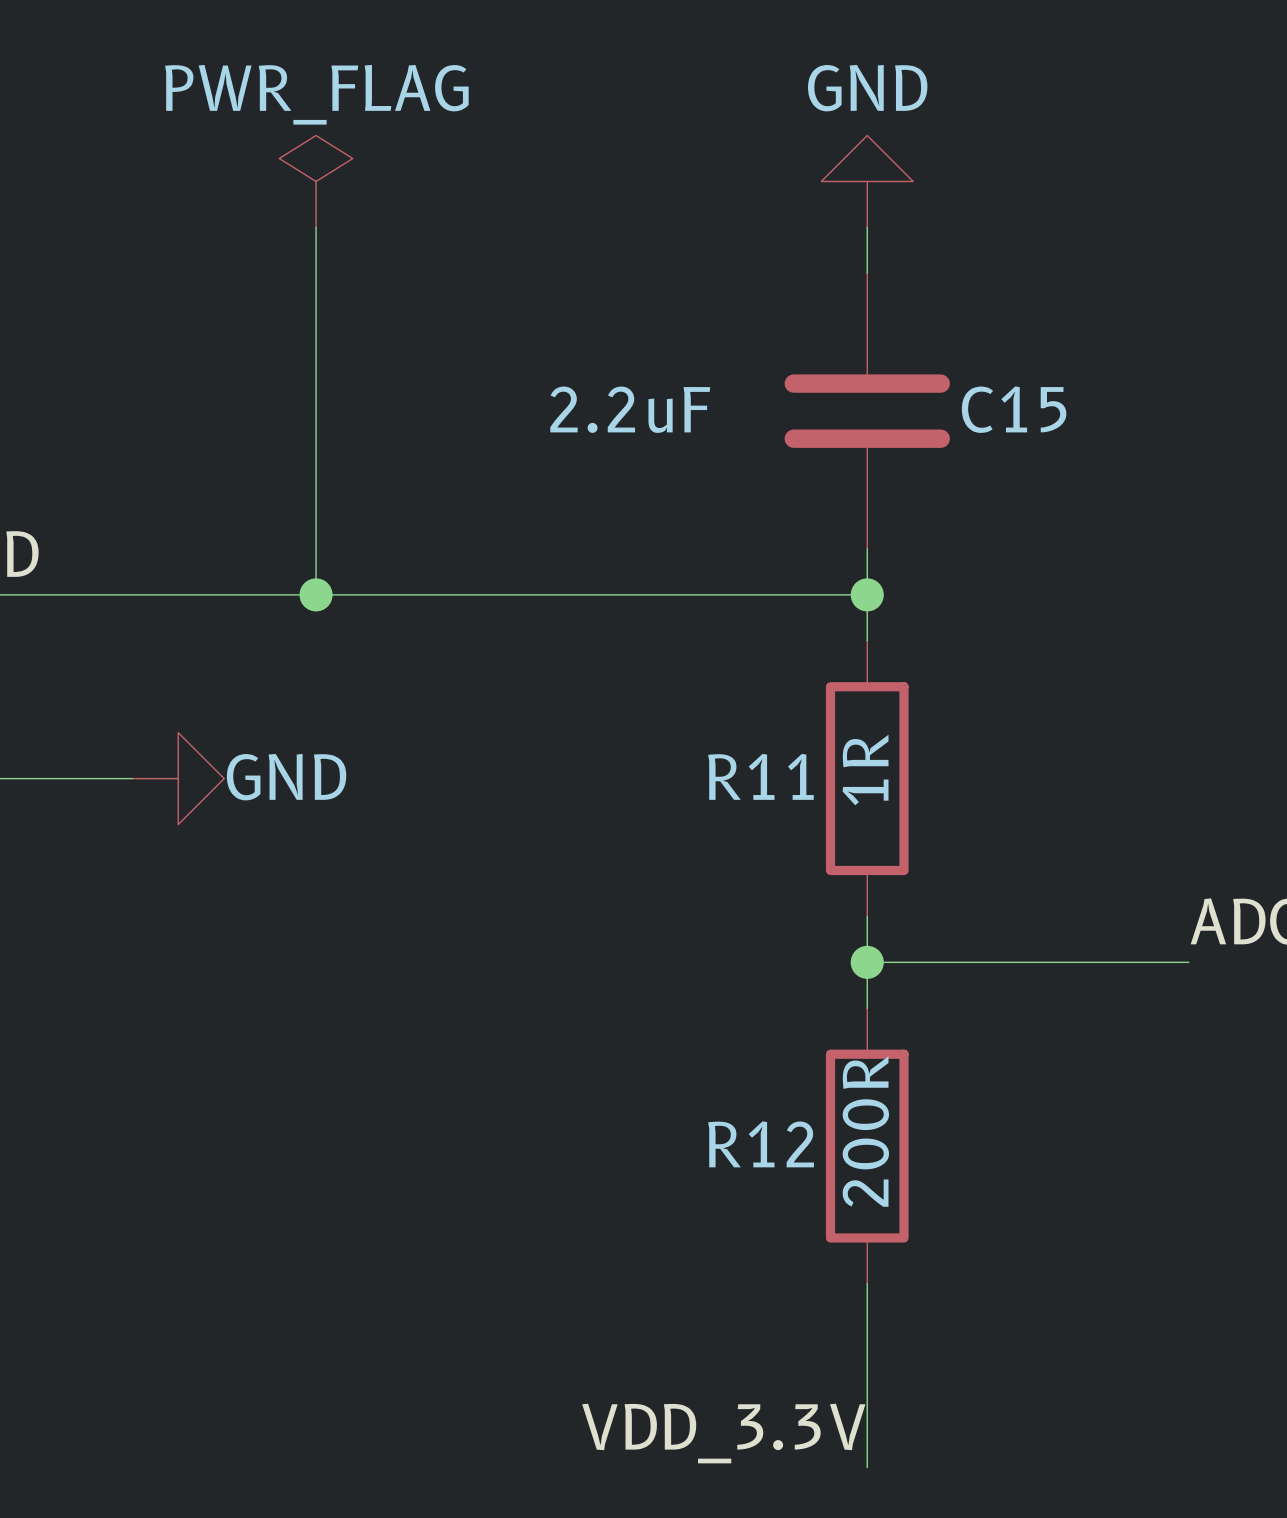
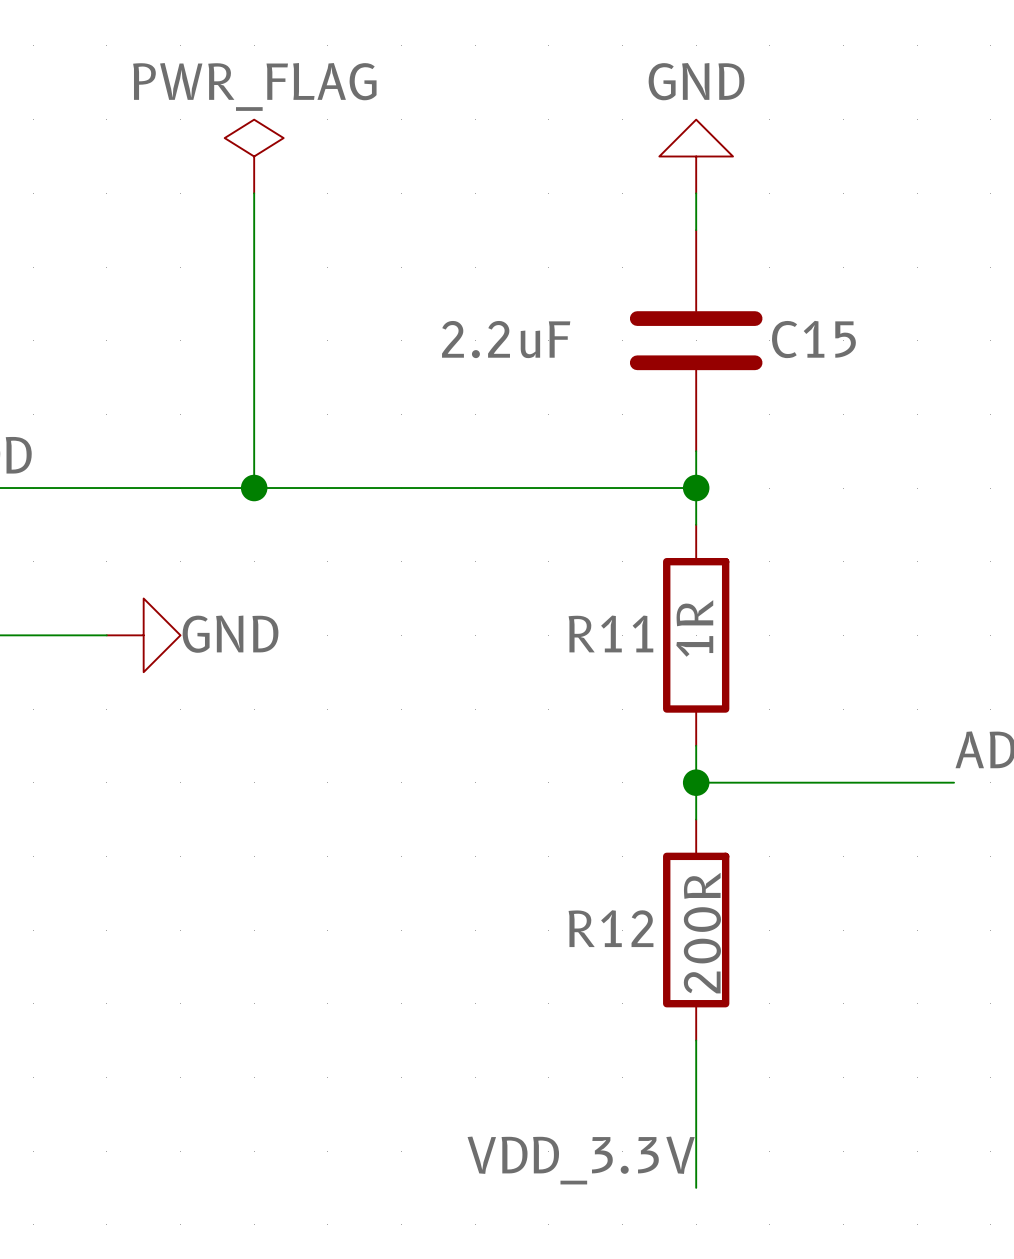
R12 value position: 200R (865, 1131) -> 200R (702, 933)

